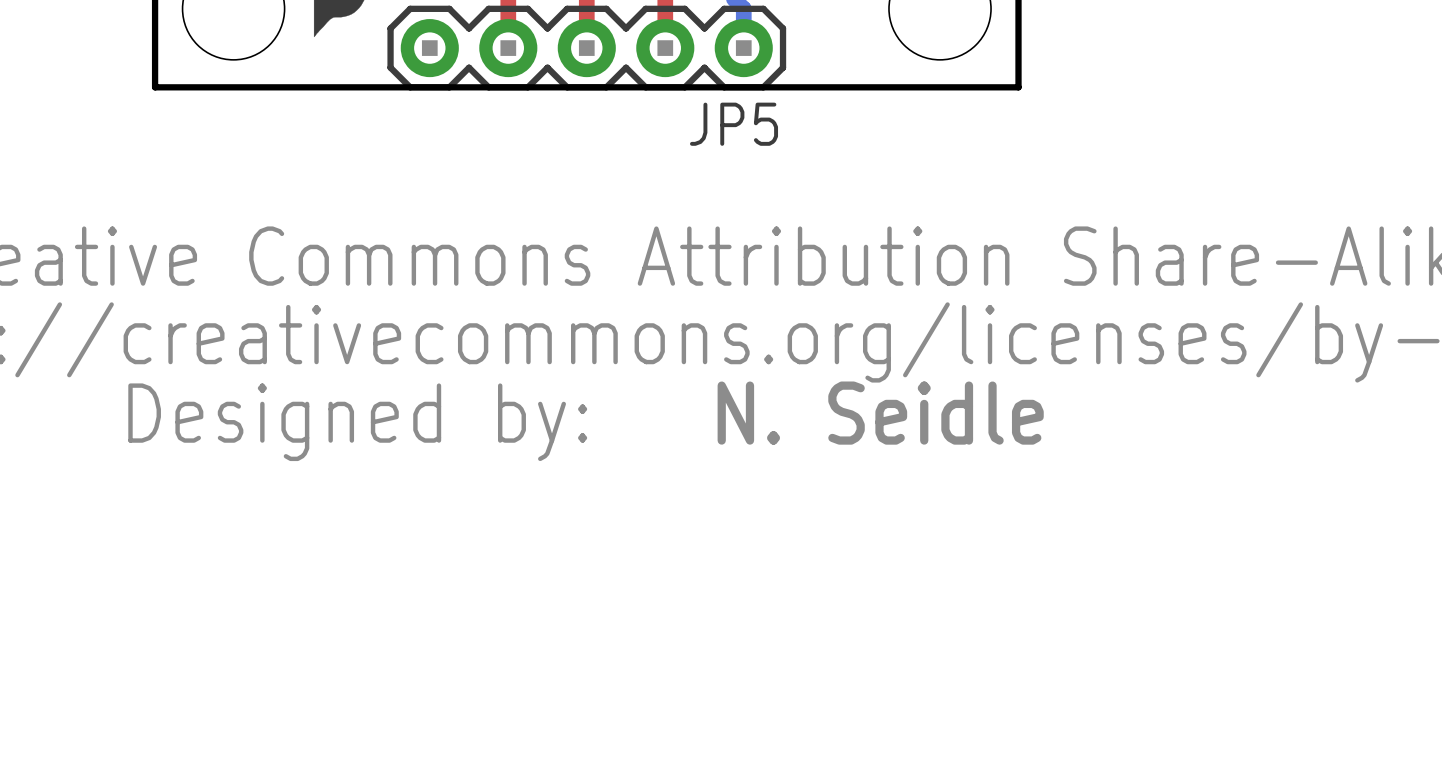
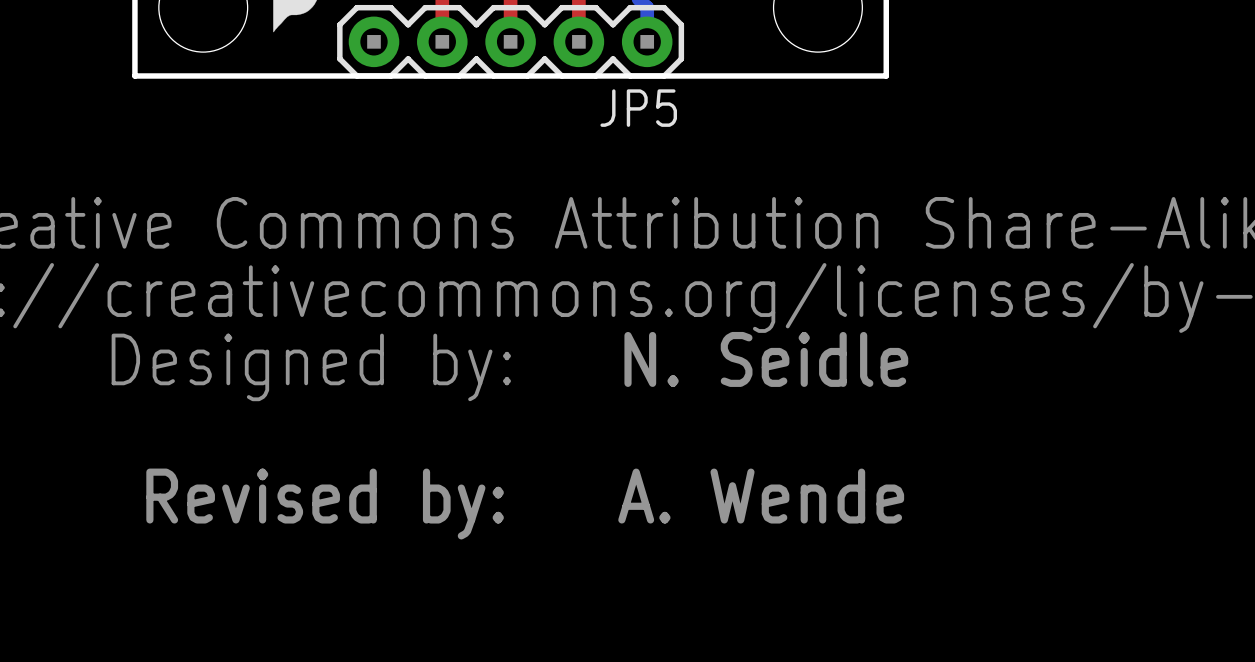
text: none -> A. Wende (761, 496)
text: none -> Revised by: (325, 504)

